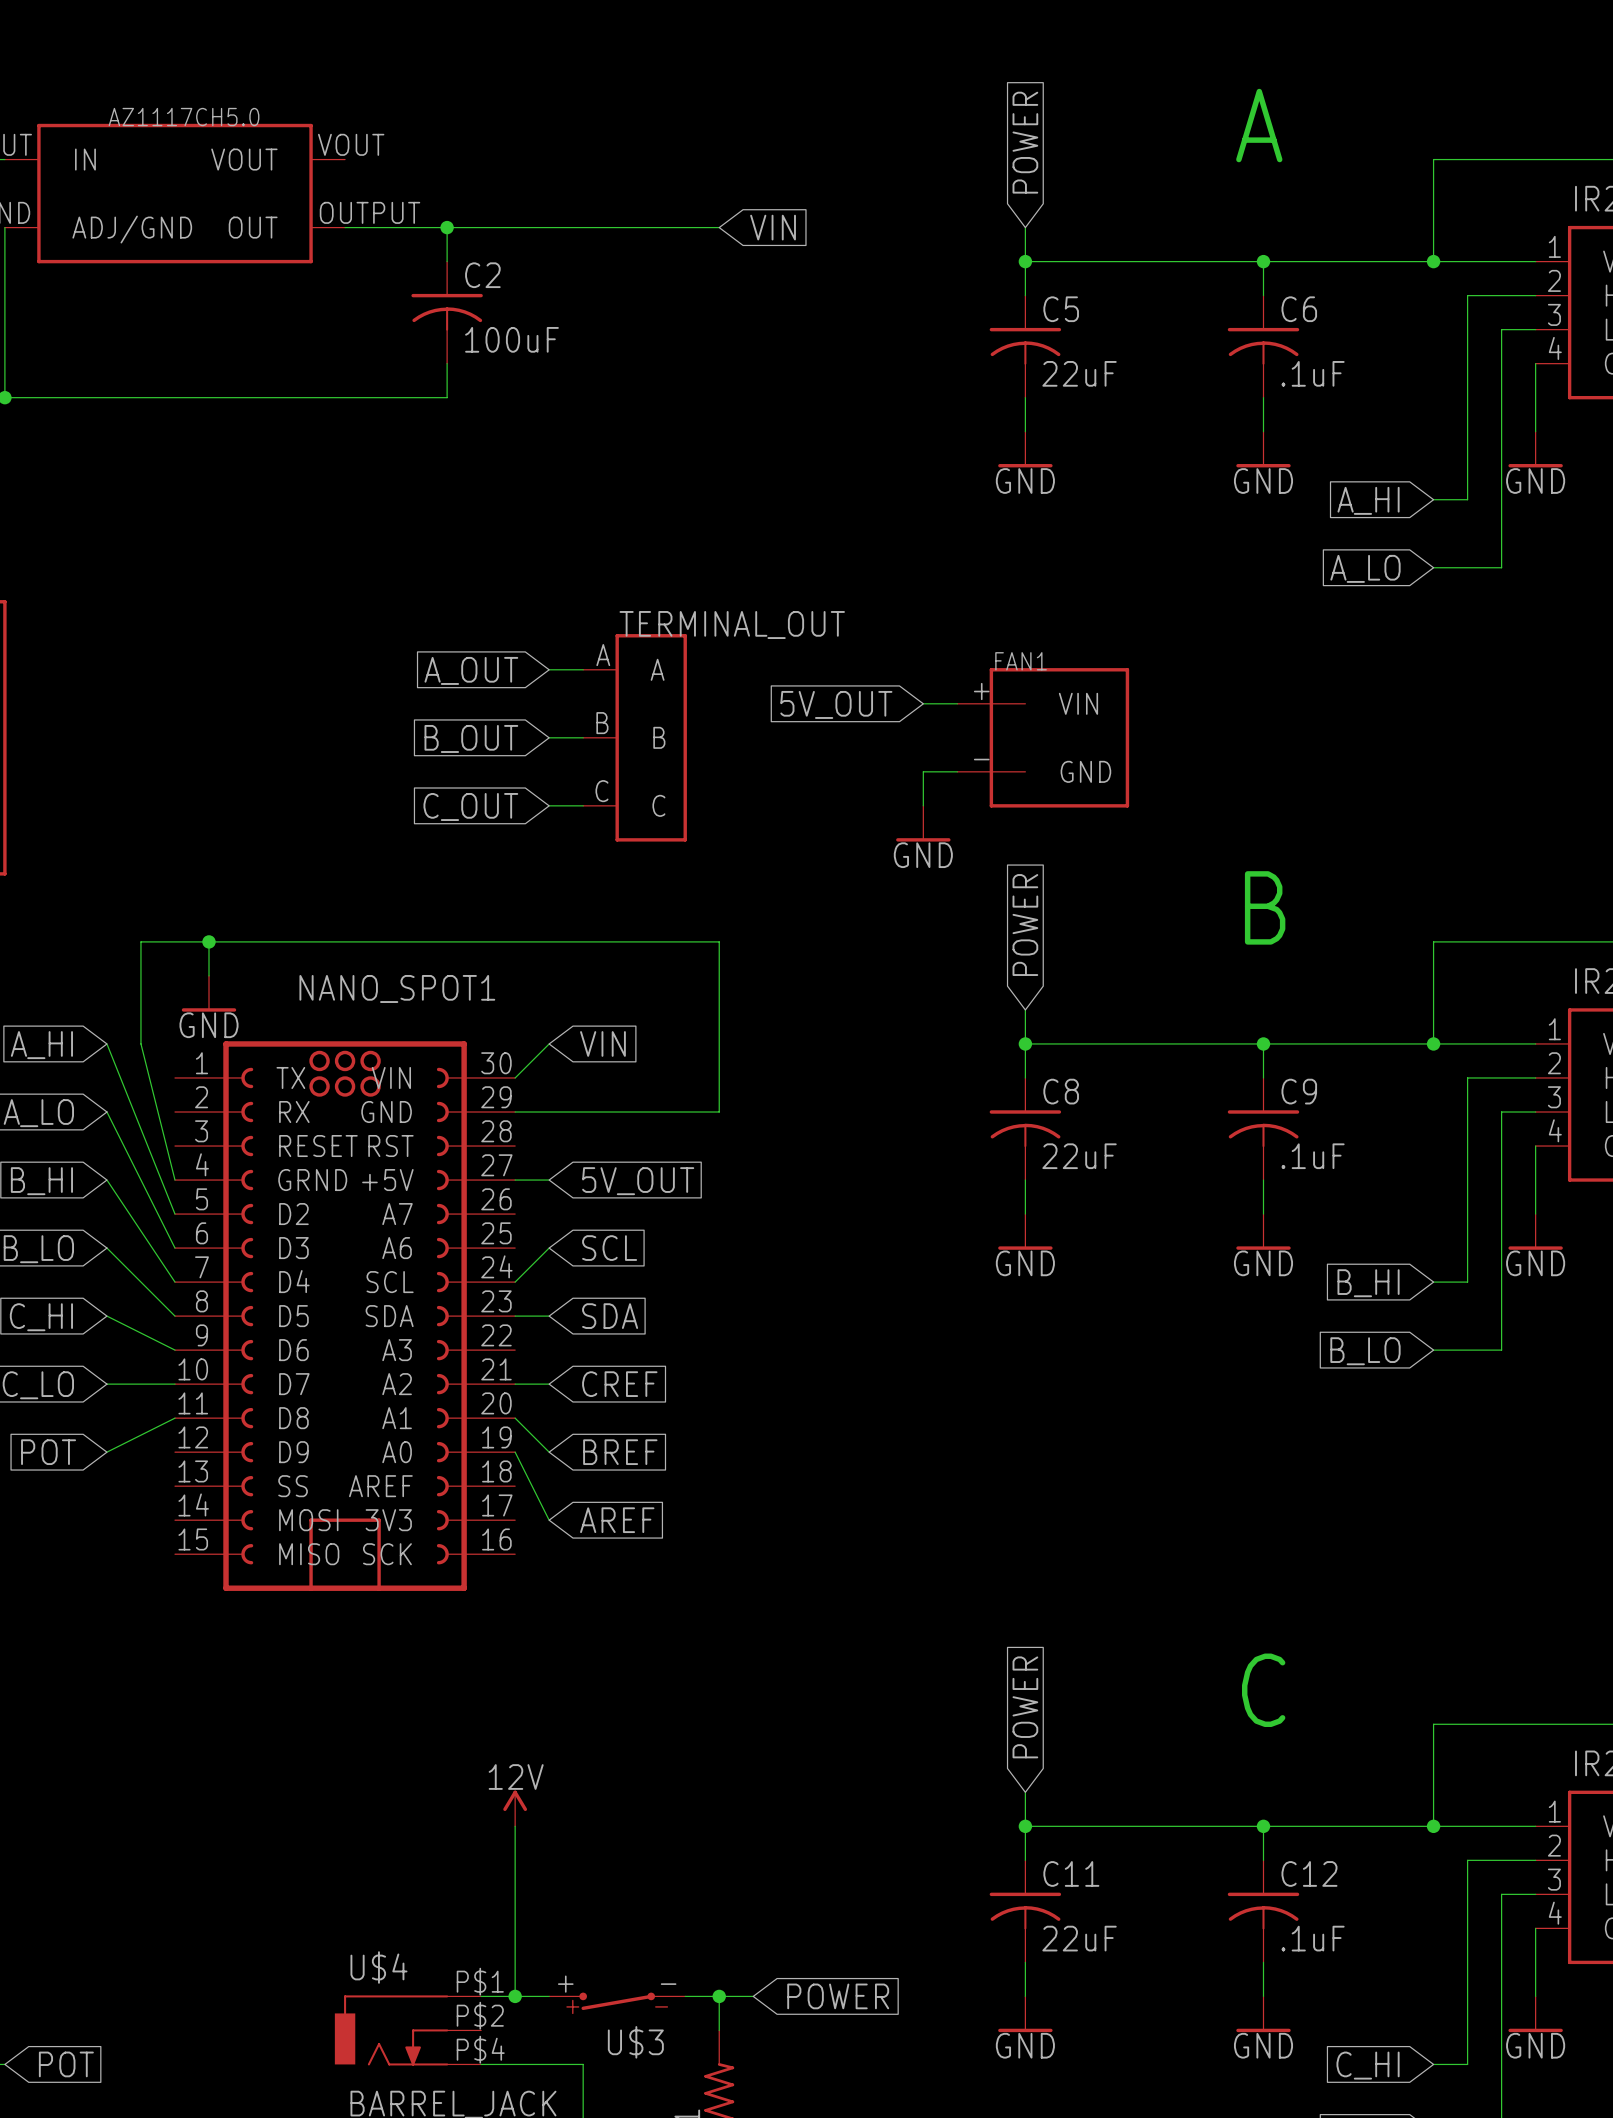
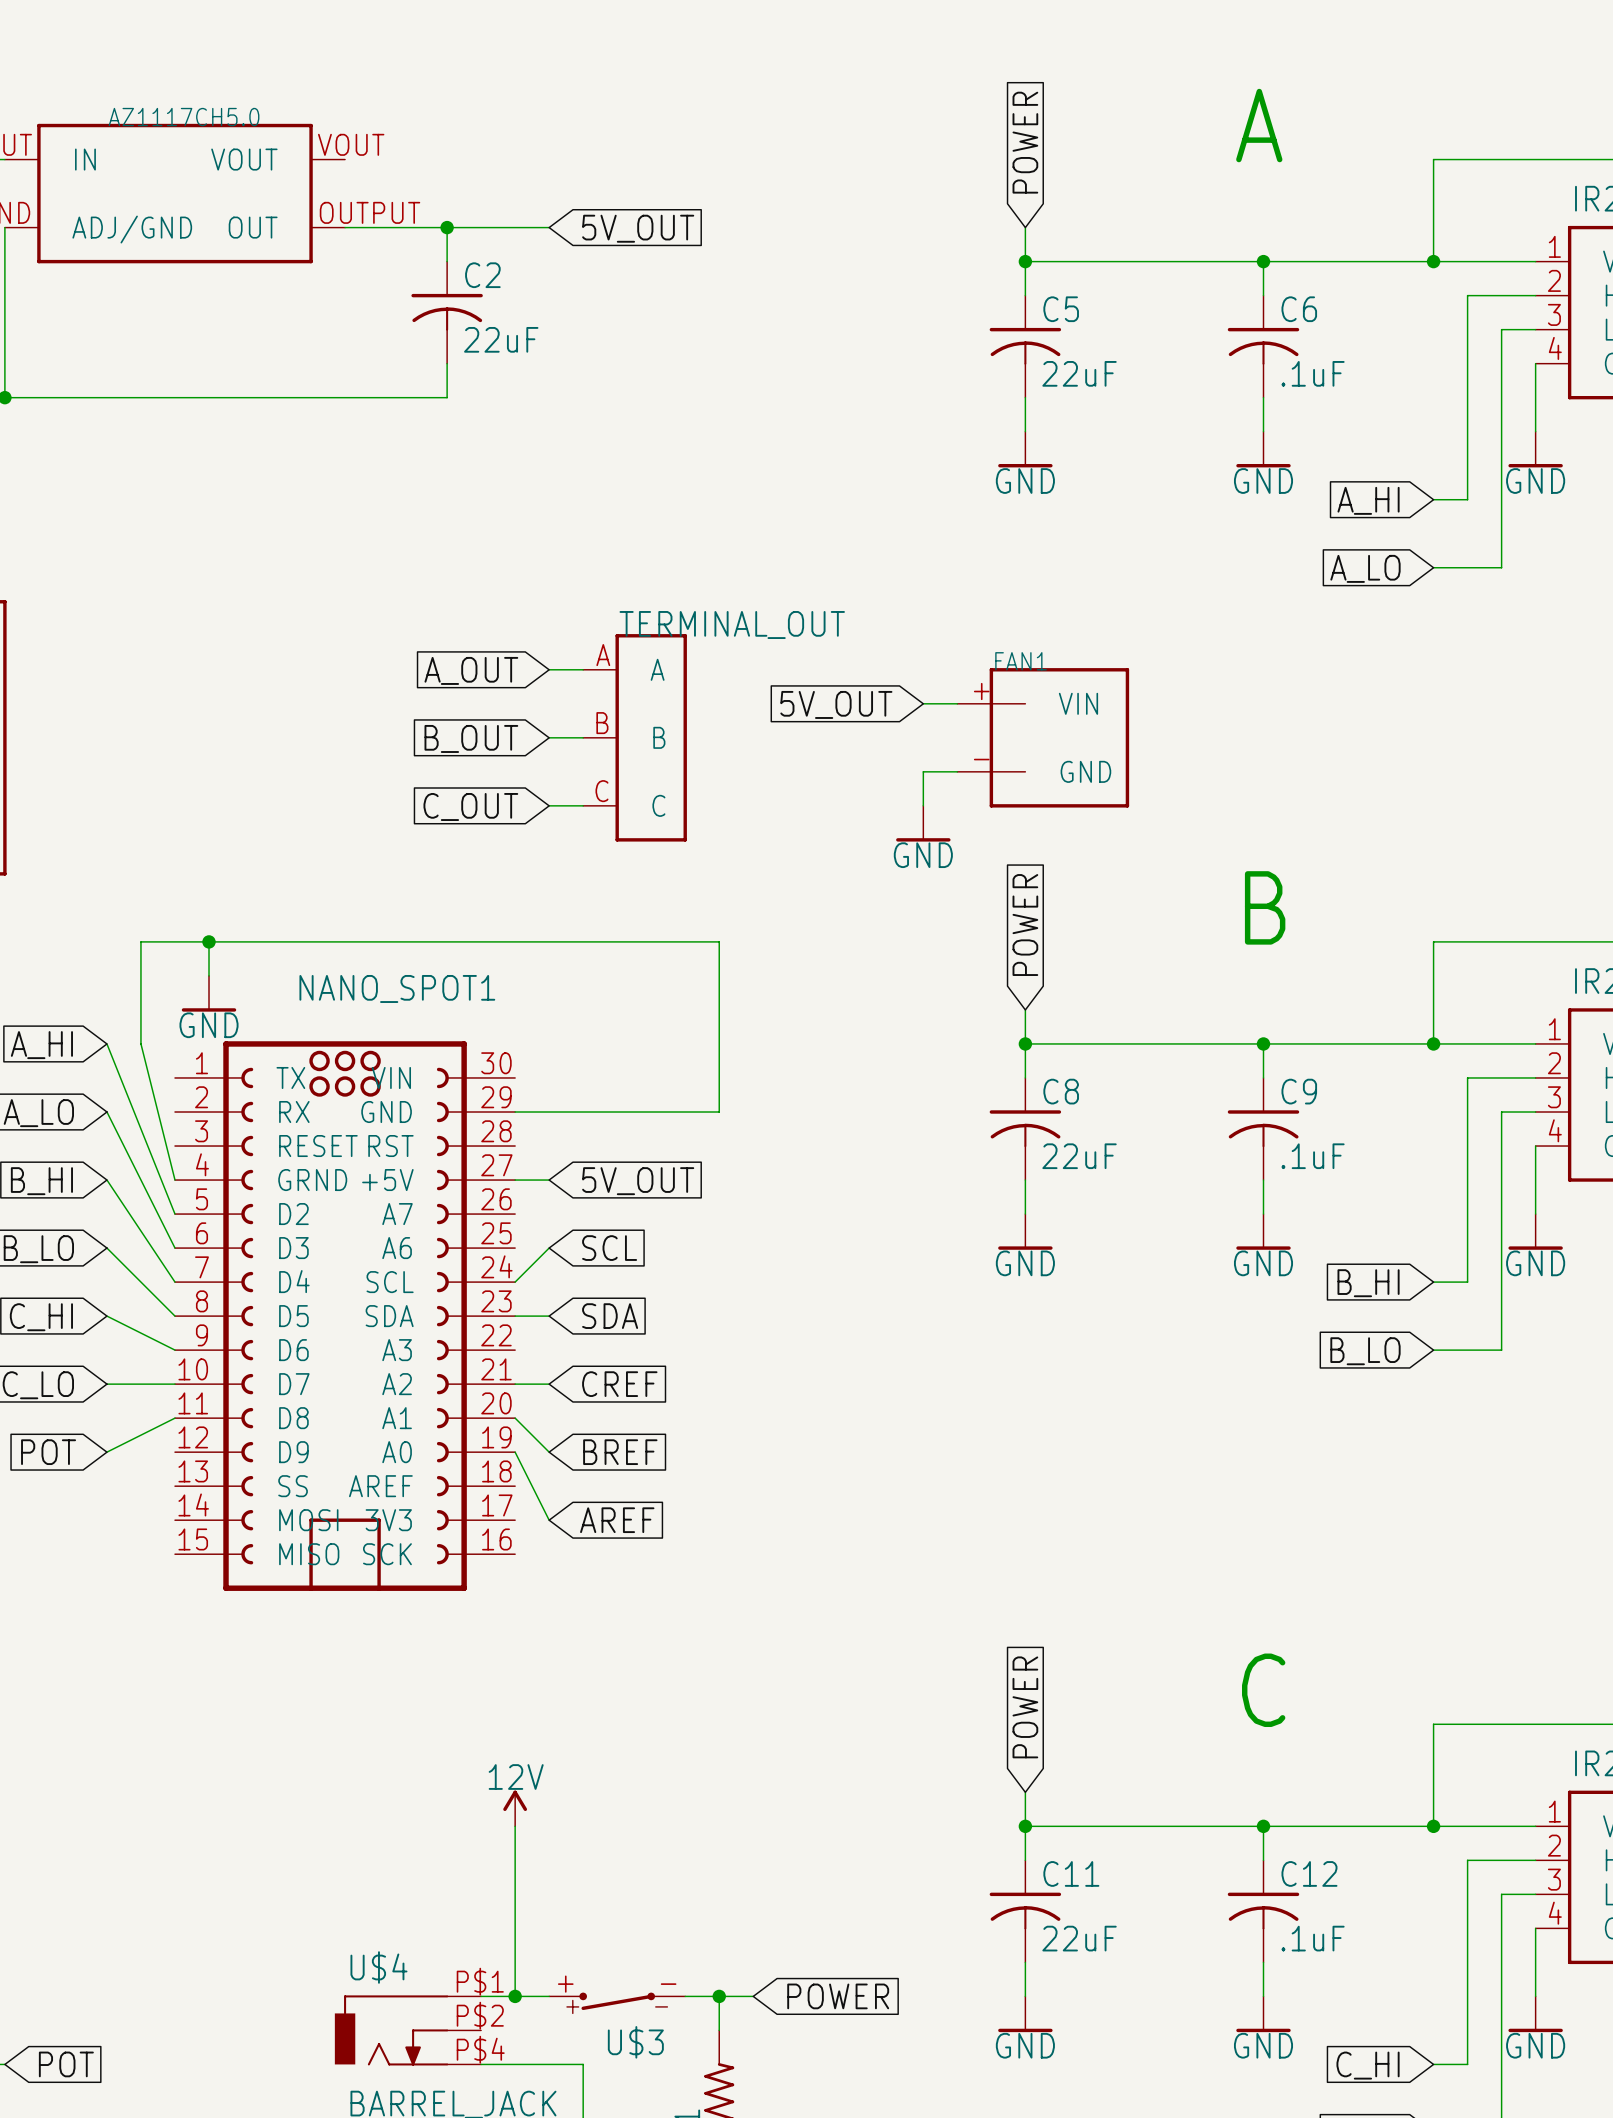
wire: (549, 227) (719, 227) -> none
global label: VIN (773, 227) -> none
global label: none -> 5V_OUT (638, 228)
C2 value: 100uF (511, 339) -> 22uF (501, 339)
wire: (549, 1043) (515, 1077) -> none
global label: VIN (602, 1043) -> none

